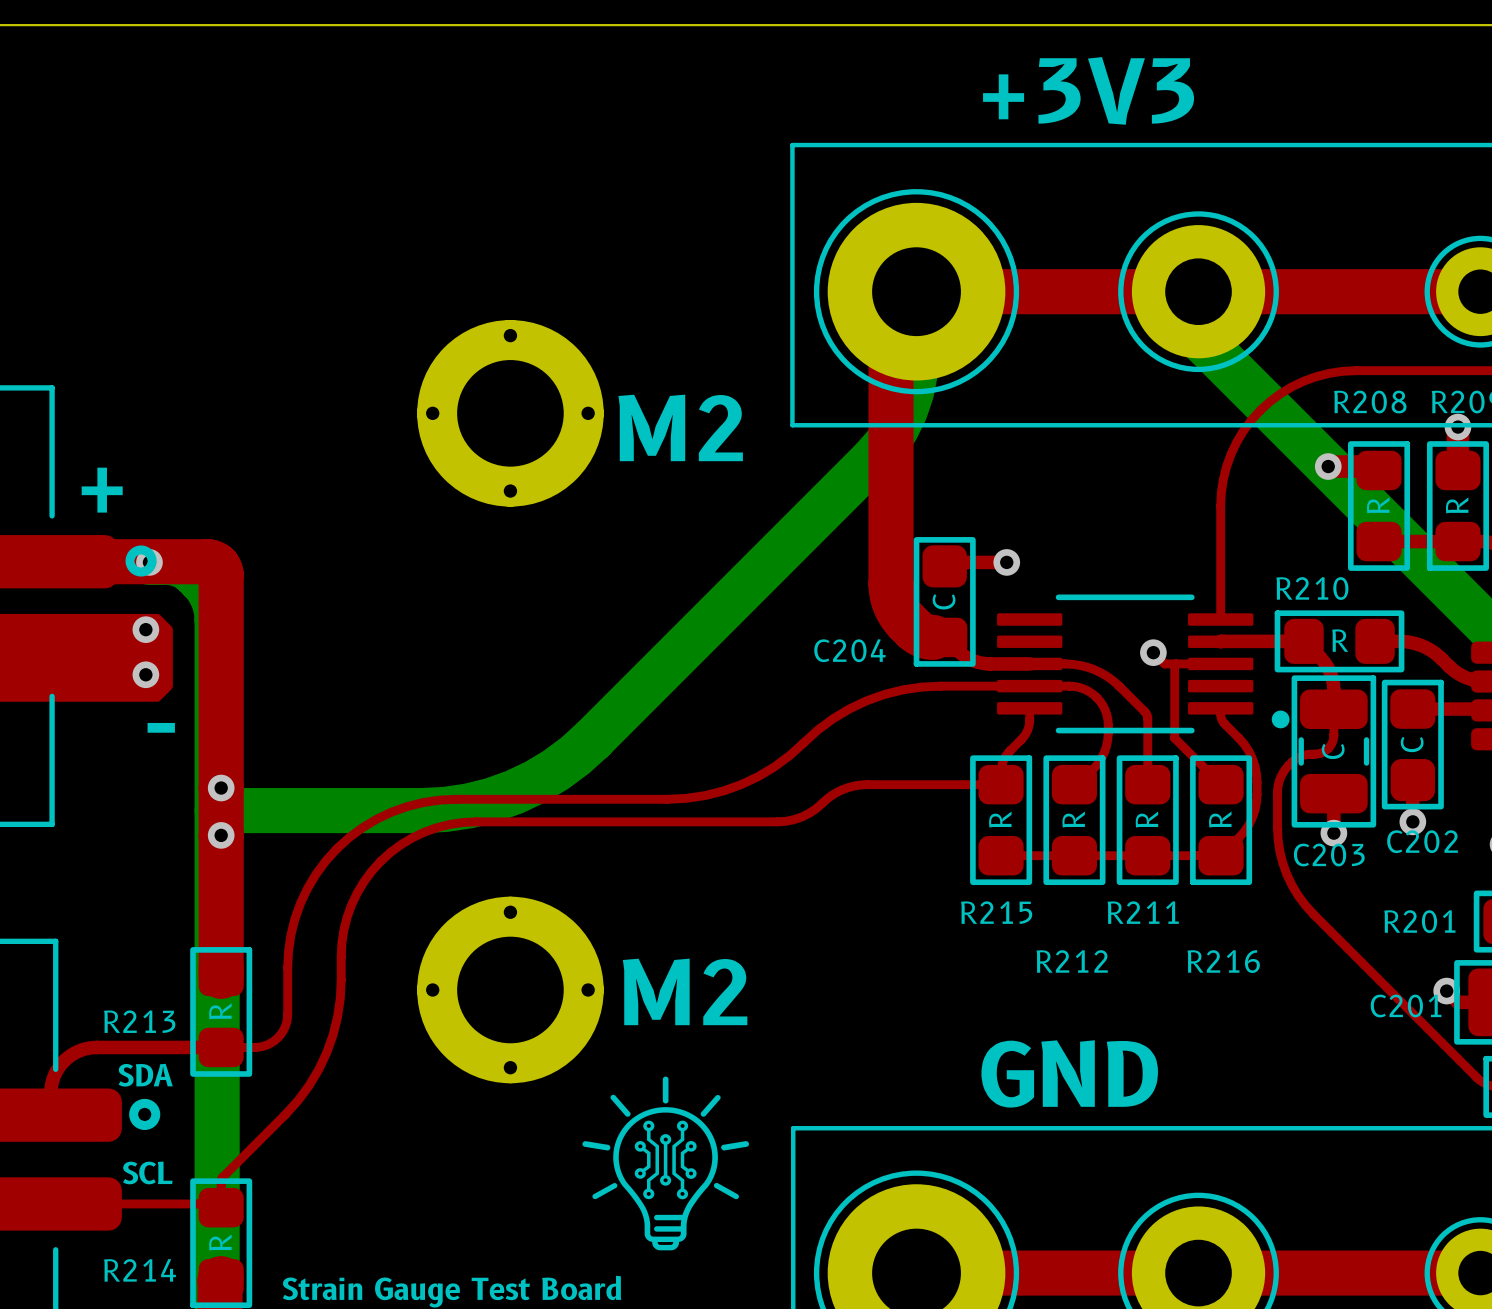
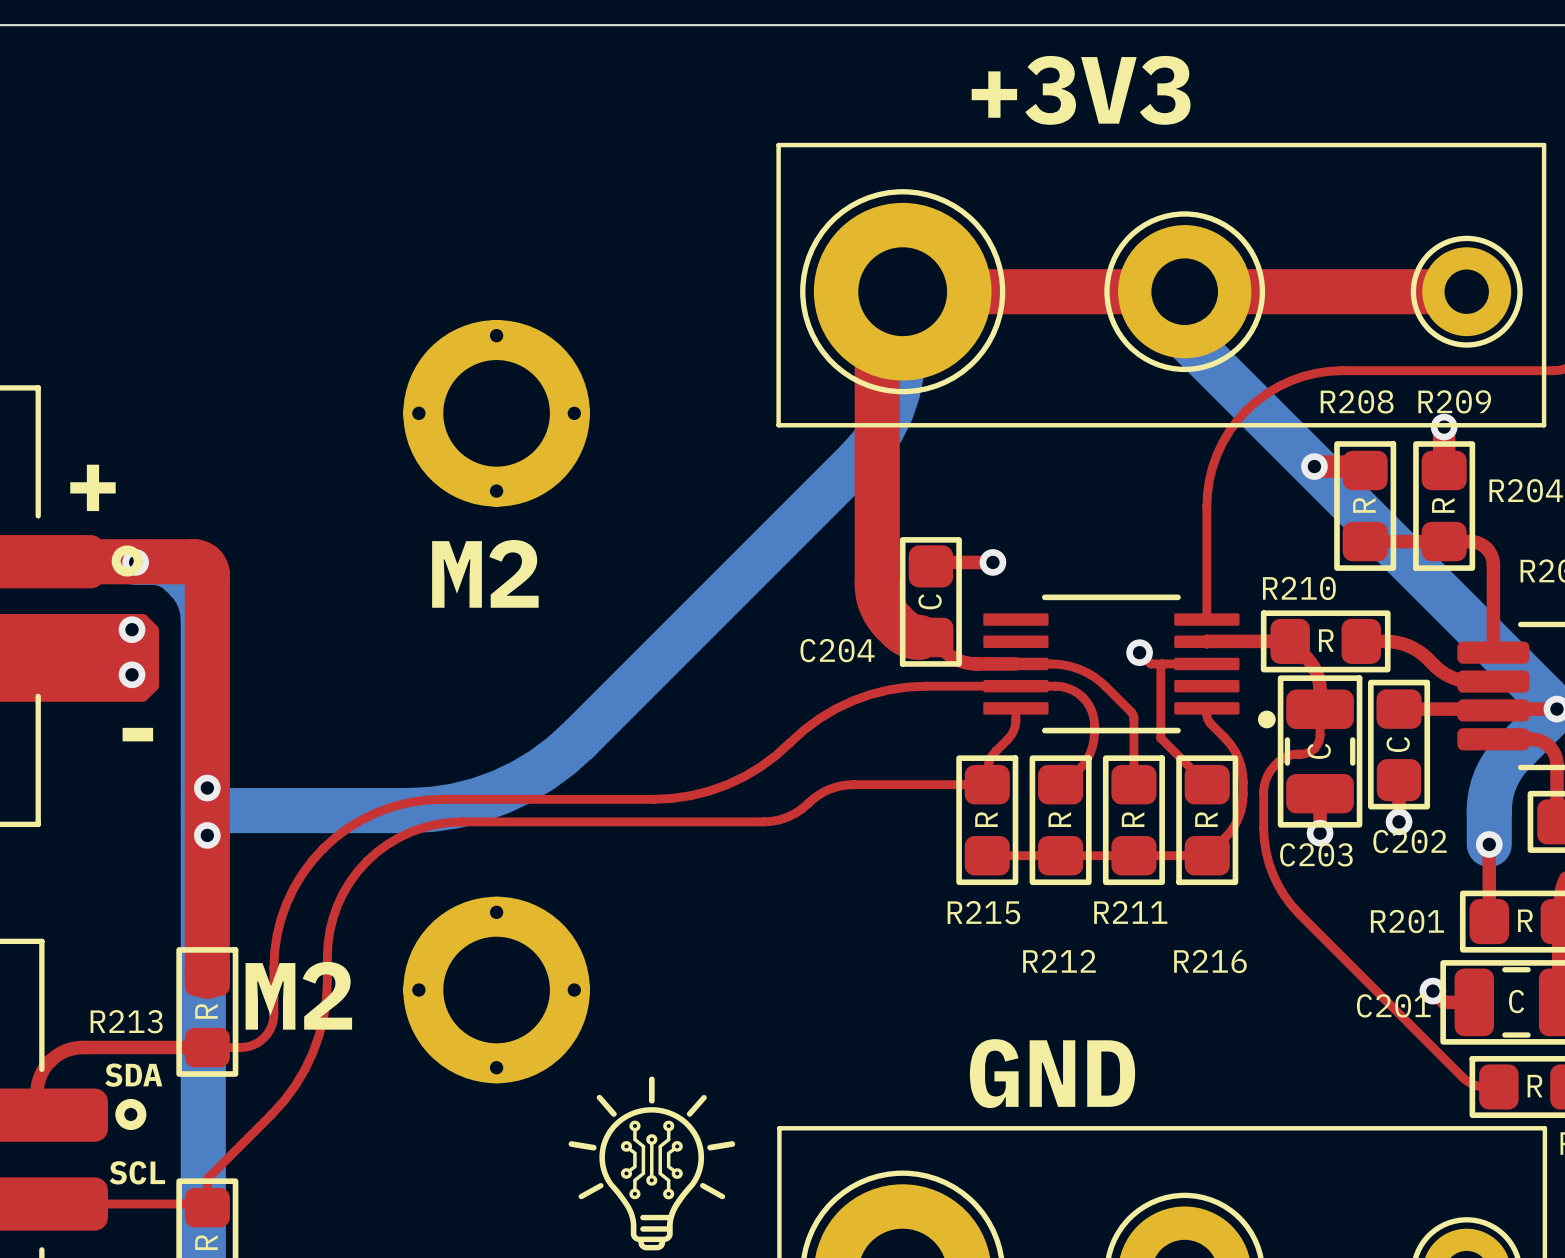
text: M2 (680, 427) -> none
text: none -> M2 (485, 573)
text: M2 (685, 991) -> none
text: none -> M2 (298, 995)

